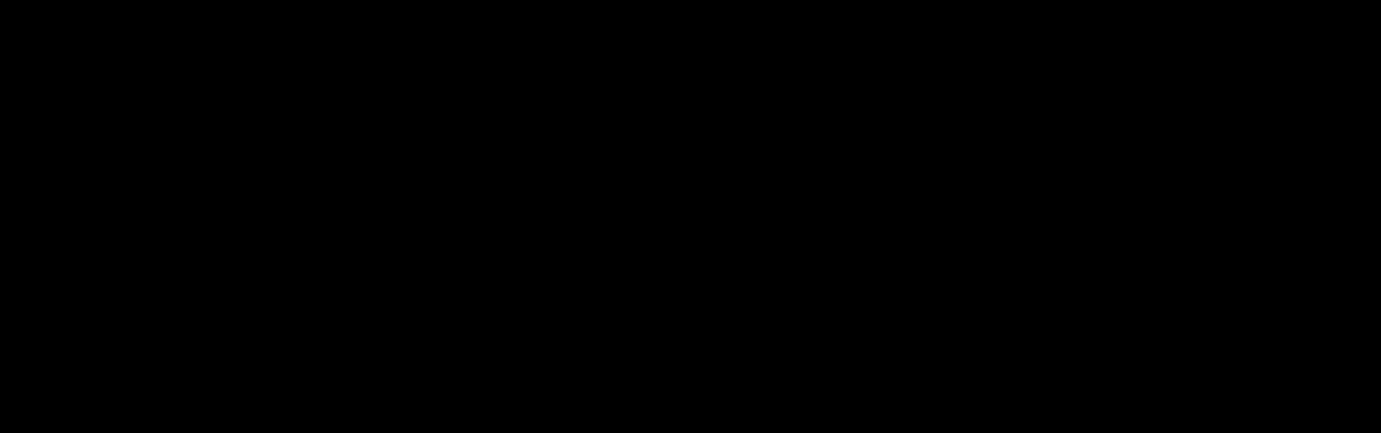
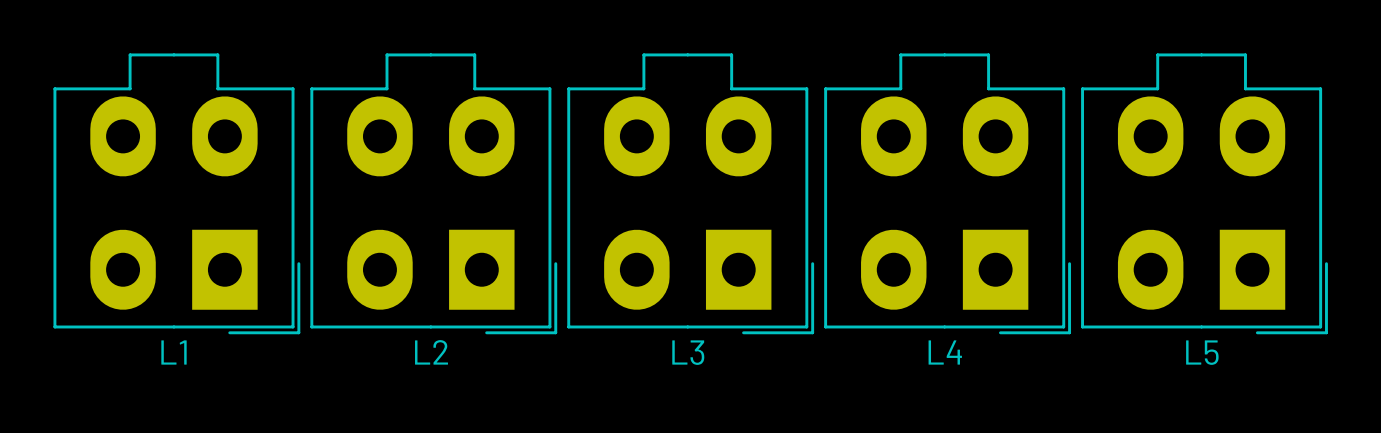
L1: none -> (176, 193)
L2: none -> (433, 193)
L3: none -> (690, 193)
L4: none -> (947, 193)
L5: none -> (1204, 193)

